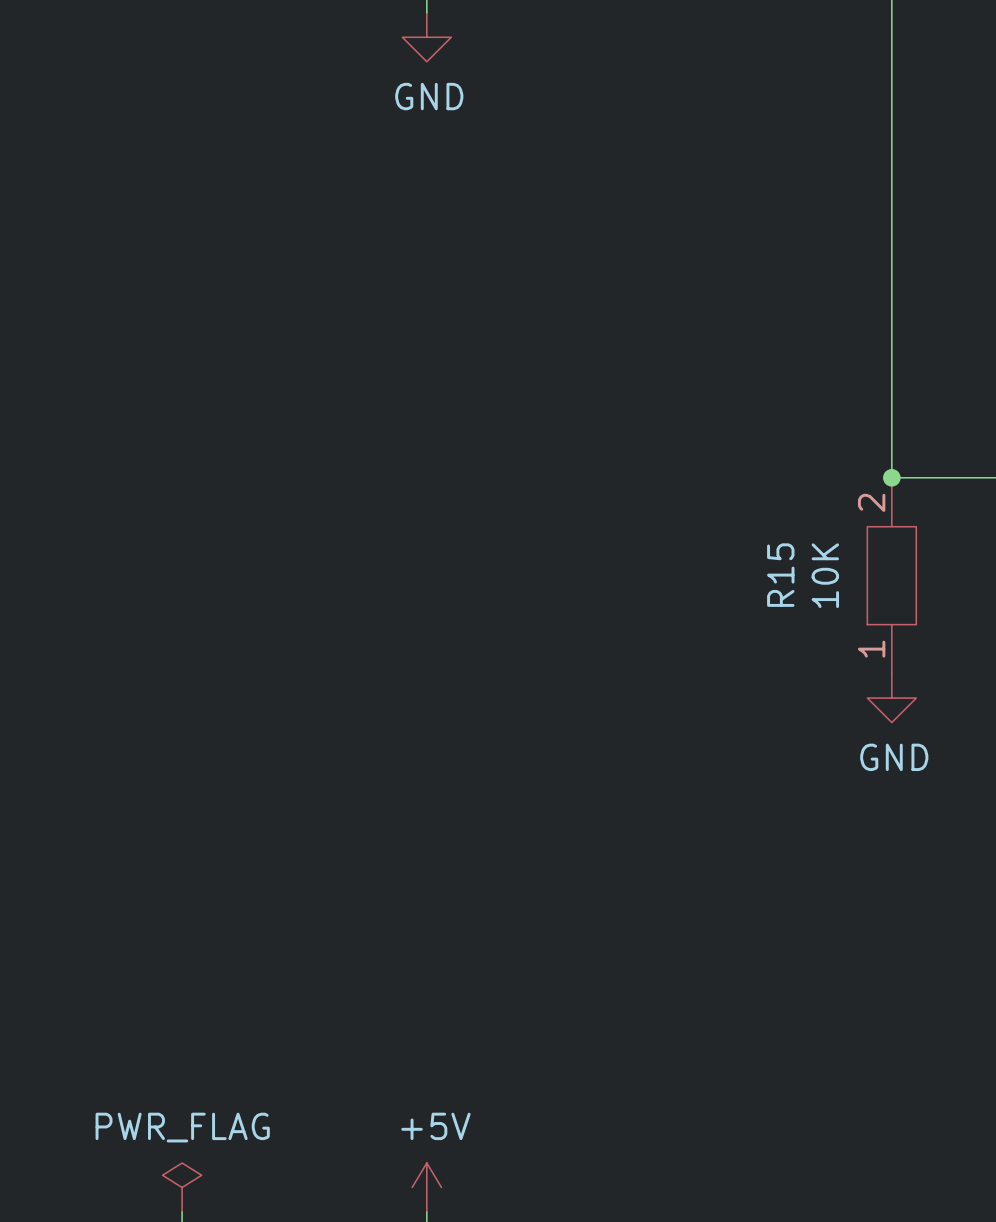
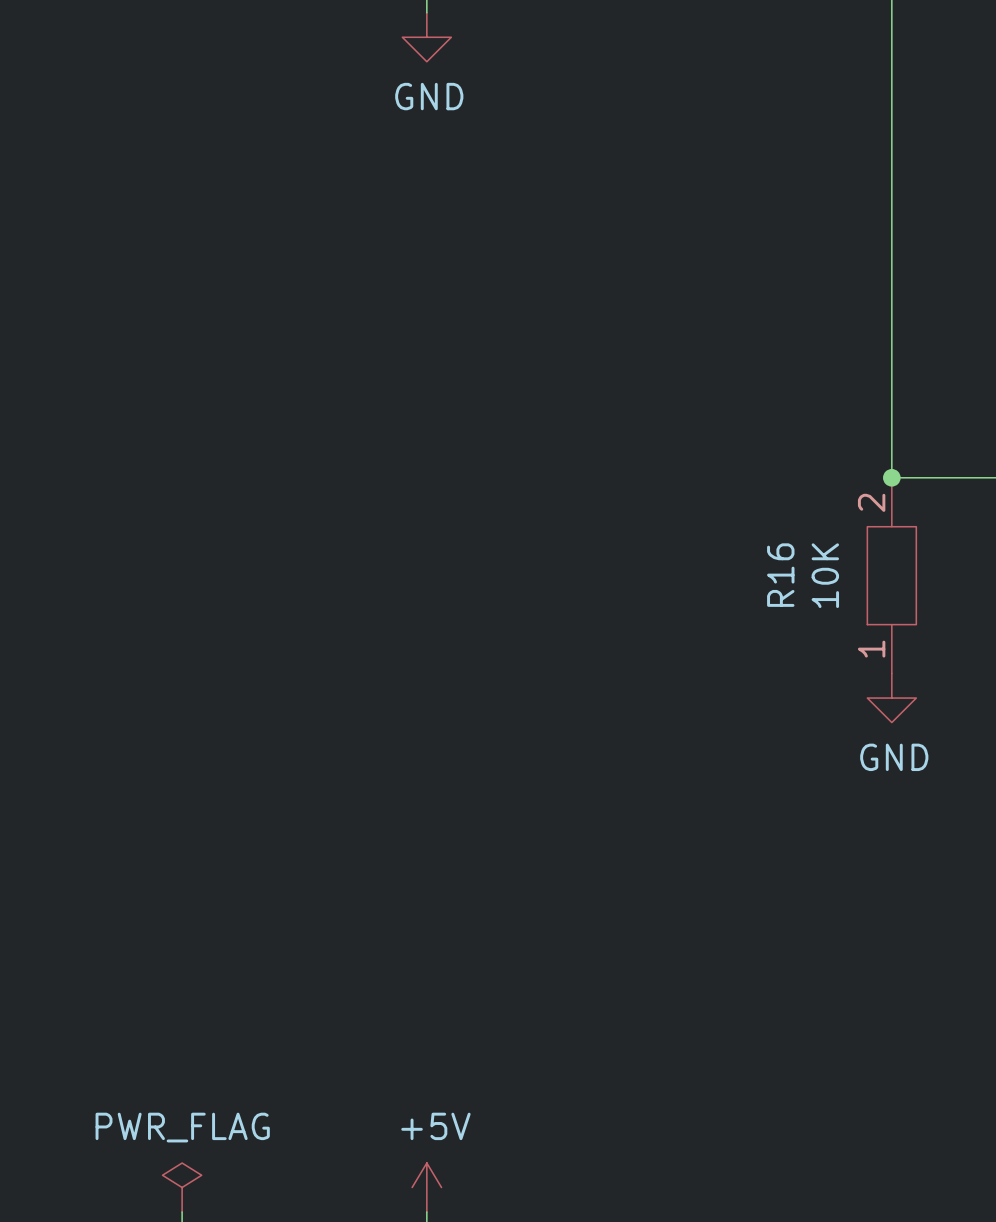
R15 name: R15 (780, 575) -> R16 (780, 575)

